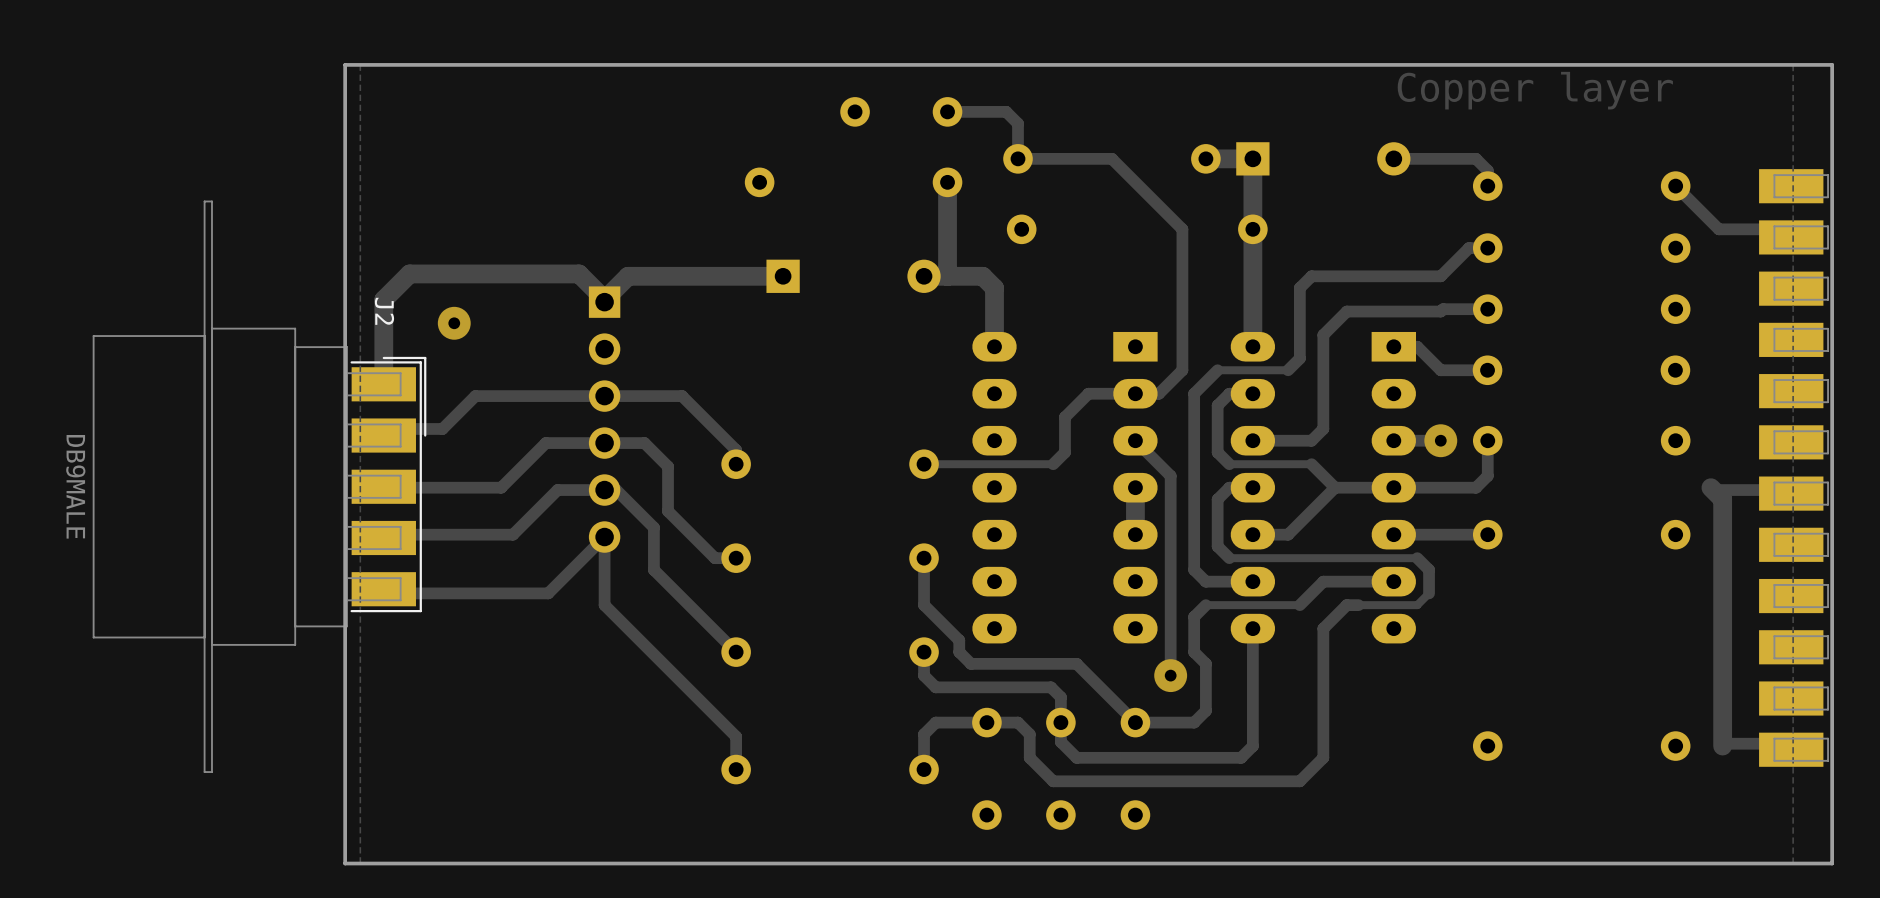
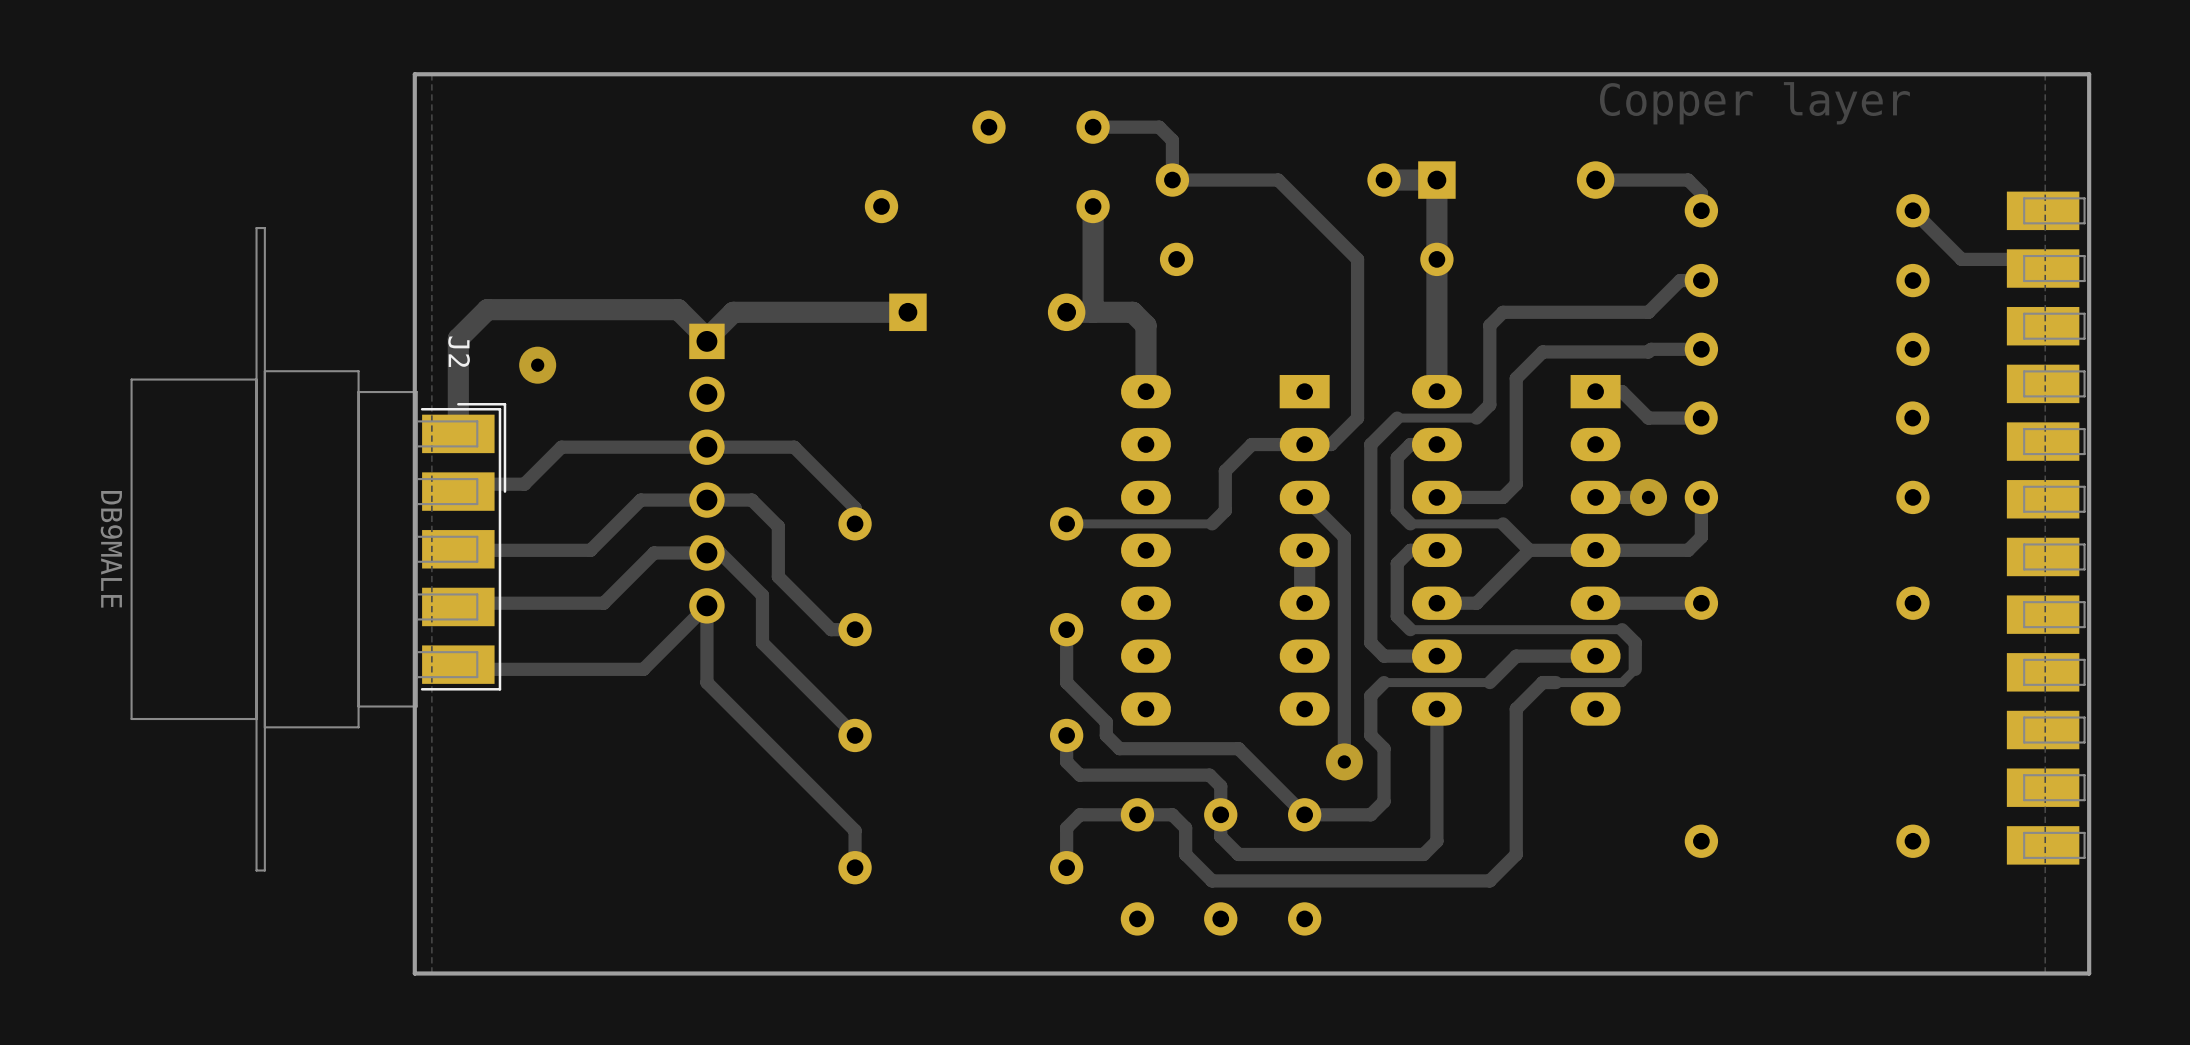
track: (1790, 490) (1710, 490) (1710, 487) (1722, 499) (1722, 746) (1722, 743) (1790, 743) -> none

